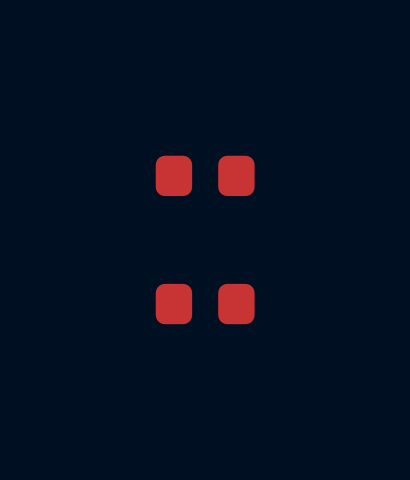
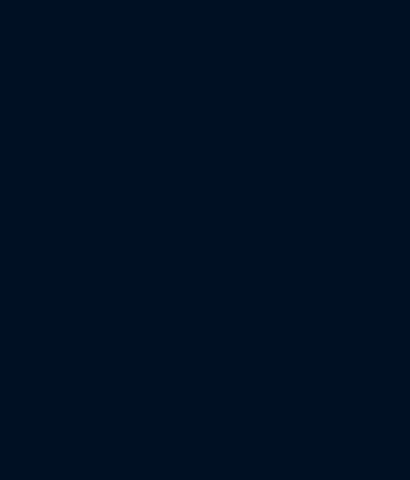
part: (205, 175) -> none
part: (205, 304) -> none

